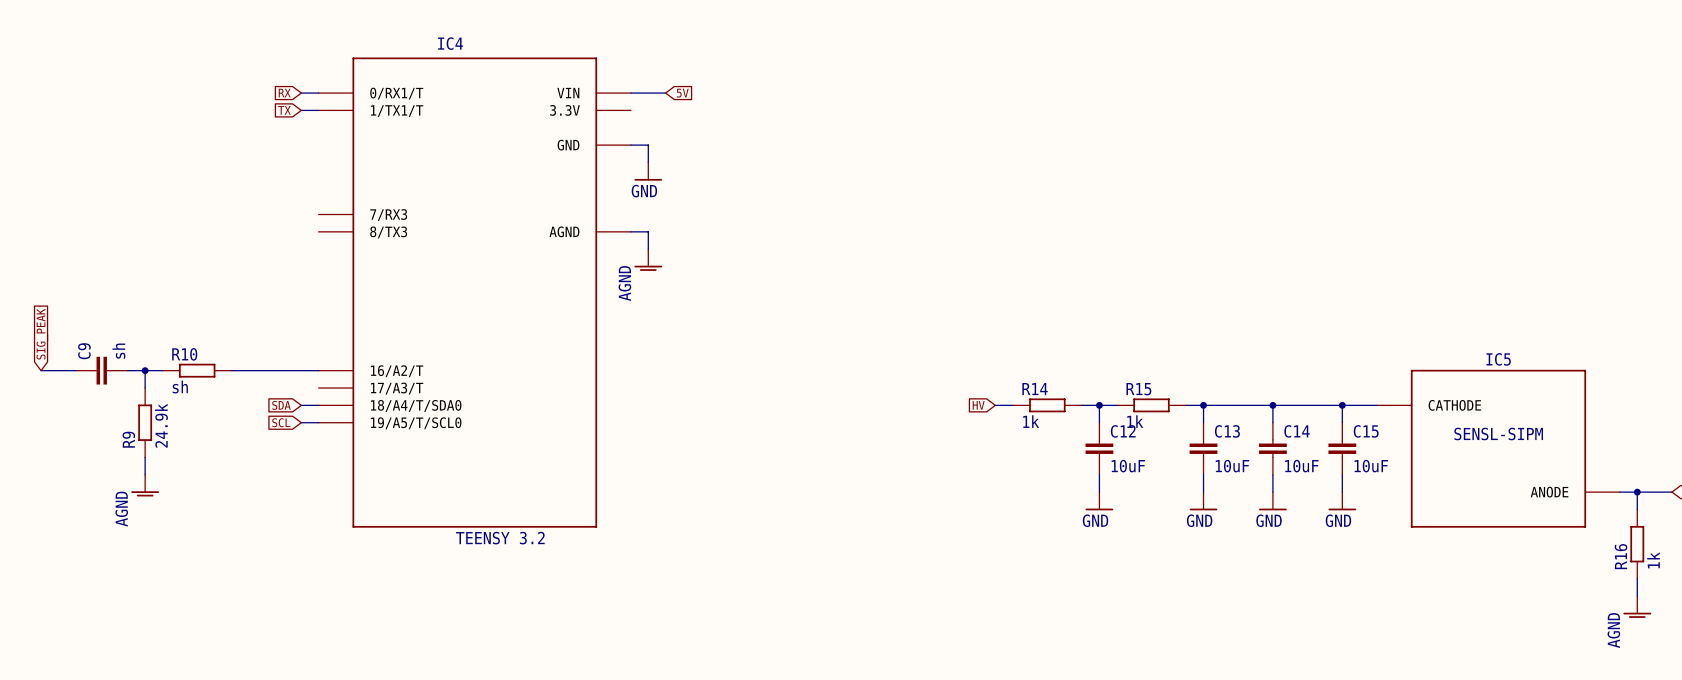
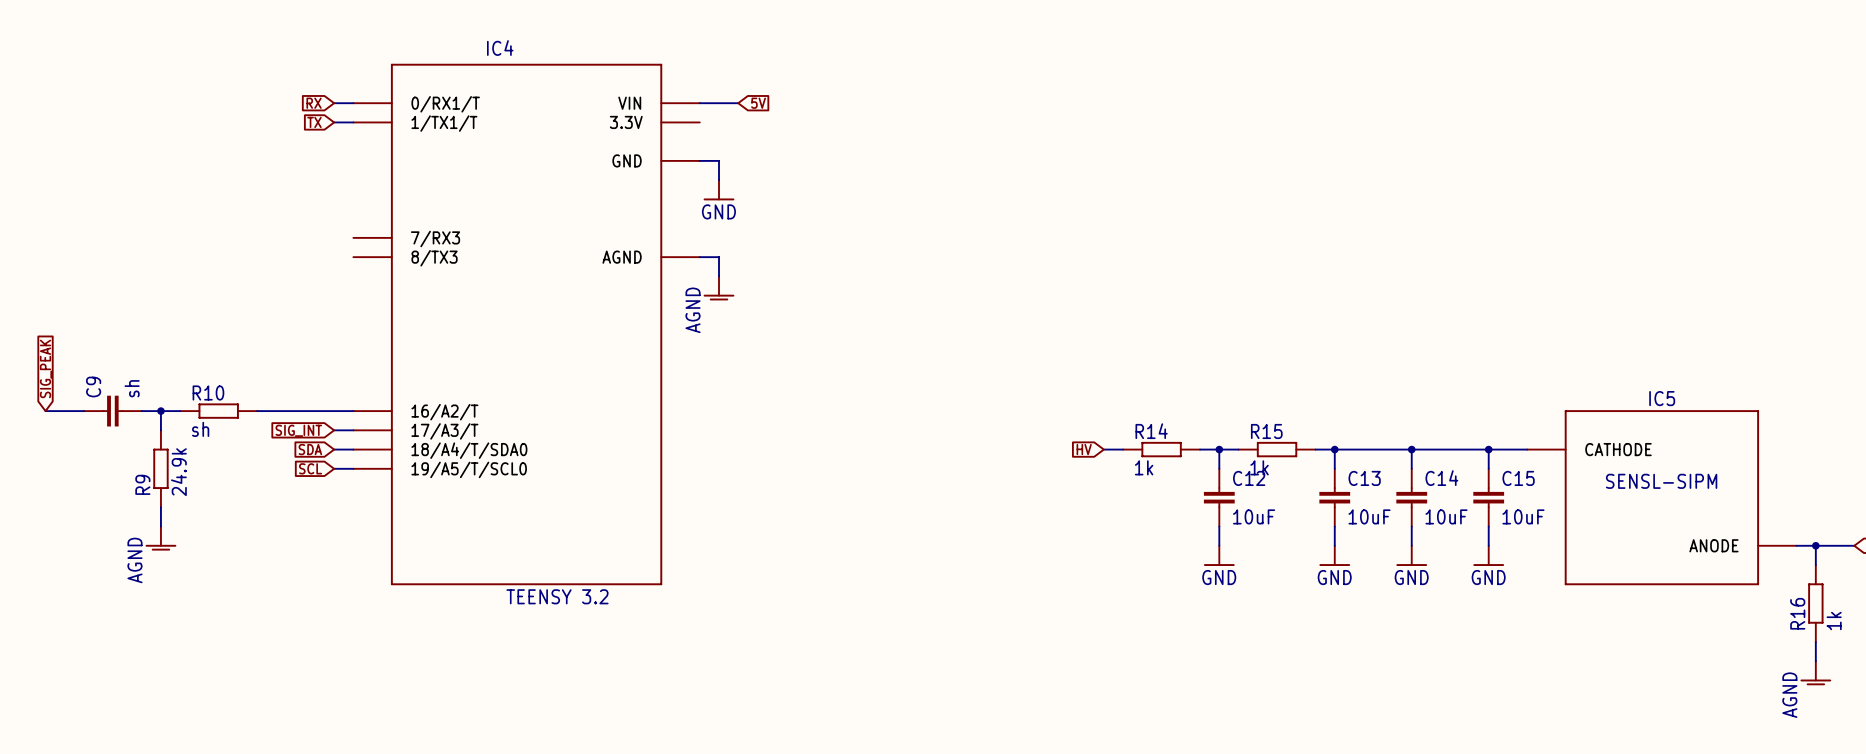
wire: none -> (334, 430) (353, 430)
global label: none -> SIG_INT (298, 430)

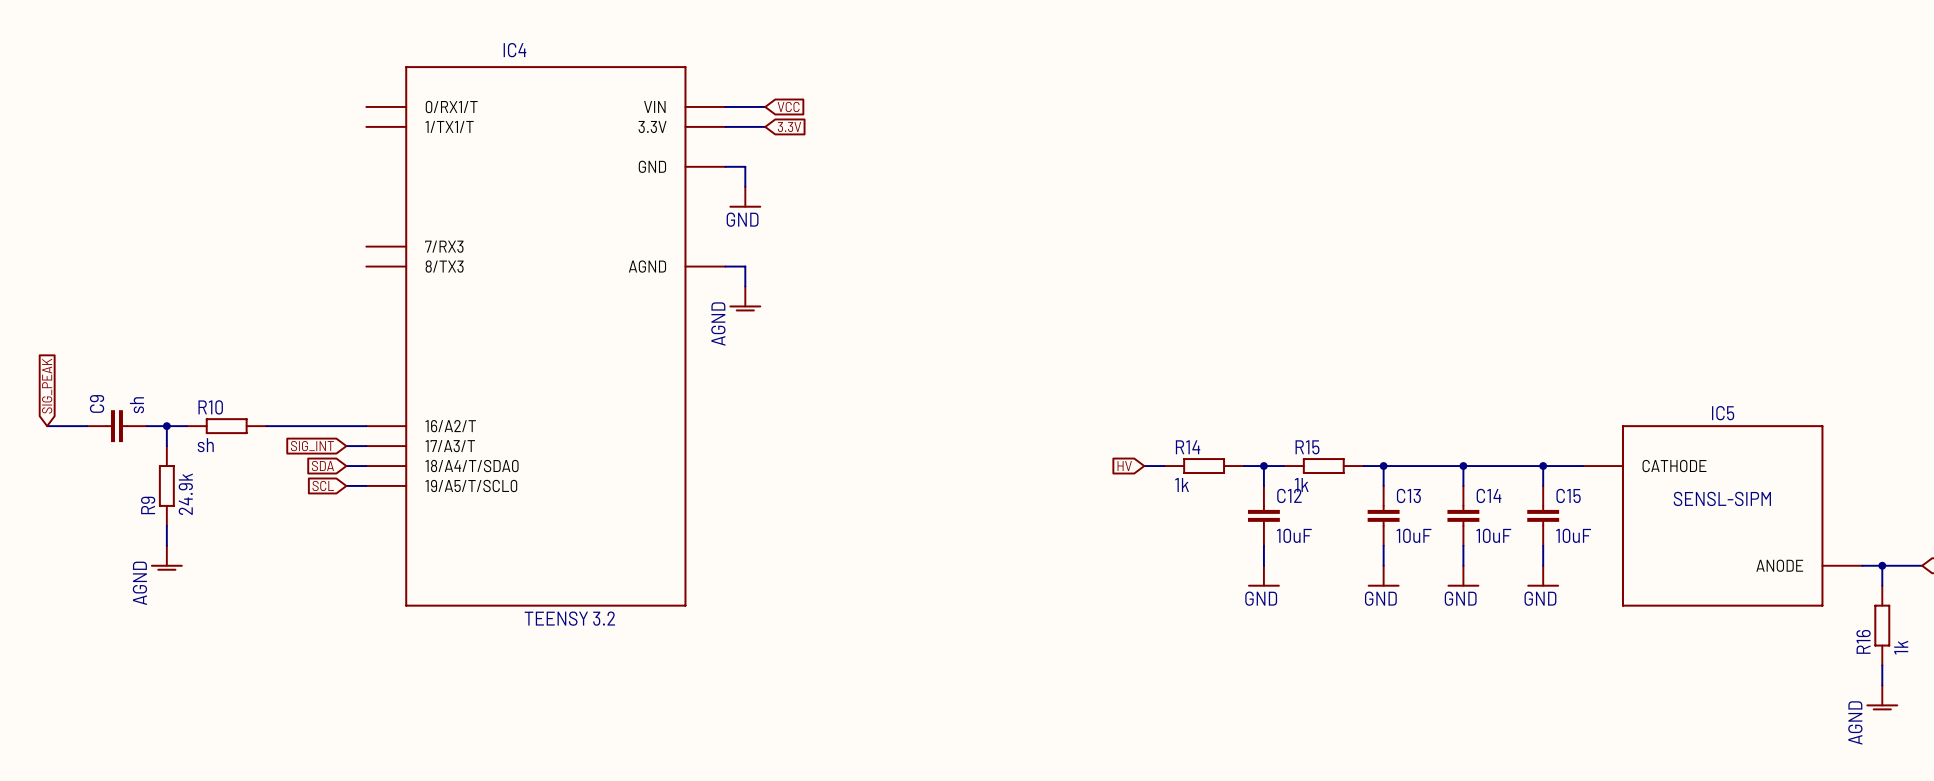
global label: RX (314, 103) -> none
wire: (334, 103) (353, 103) -> none
global label: 5V (758, 103) -> VCC (788, 106)
global label: TX (314, 122) -> none
wire: (334, 122) (353, 122) -> none
wire: none -> (725, 126) (765, 126)
global label: none -> 3.3V (789, 126)

